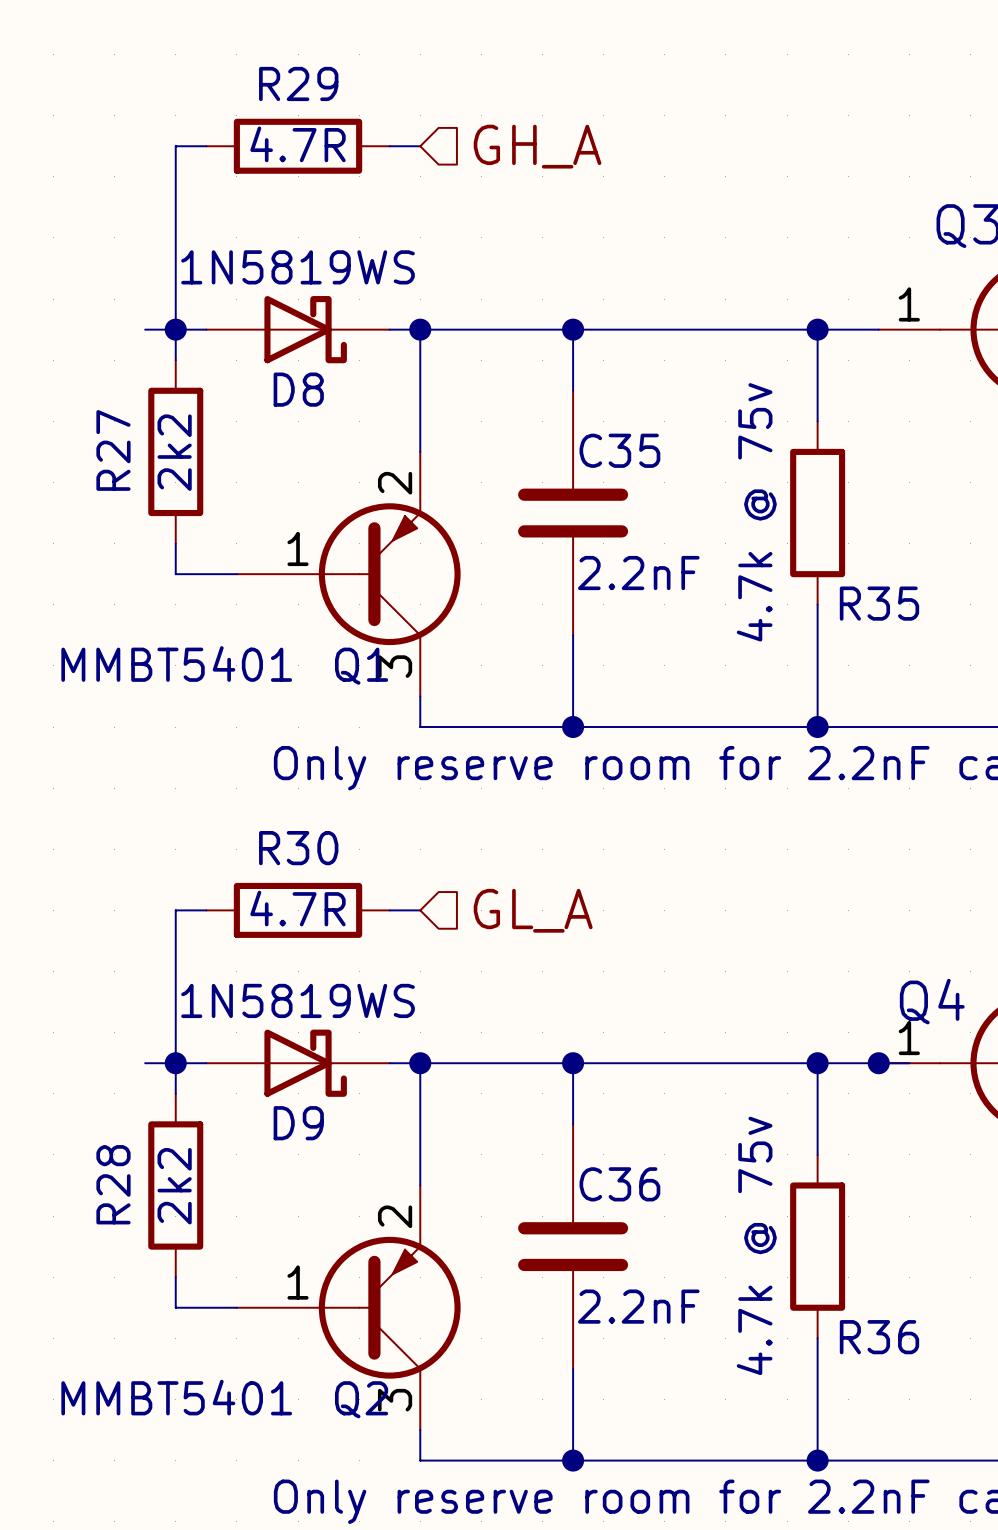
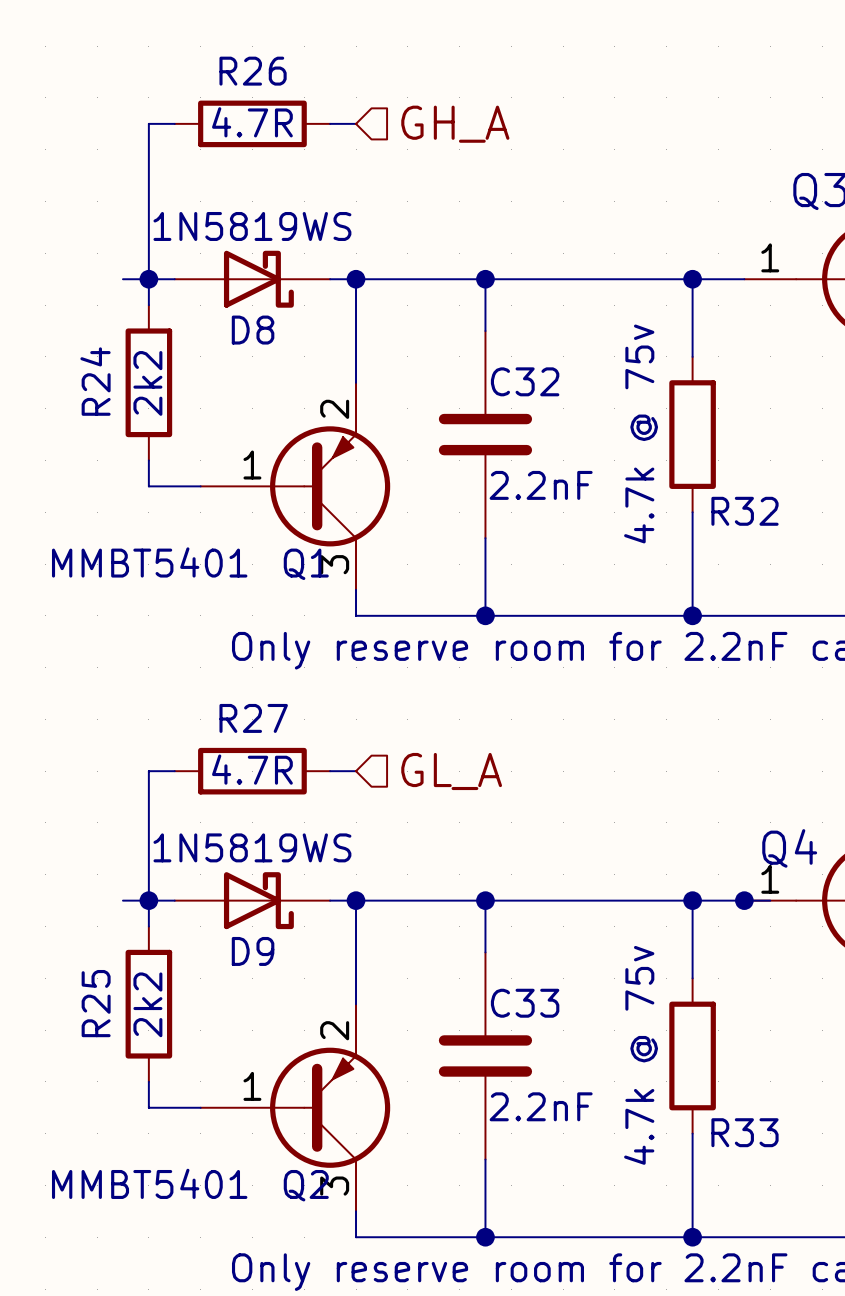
R29 name: R29 (298, 83) -> R26 (253, 71)
R27 name: R27 (113, 450) -> R24 (95, 381)
C35 name: C35 (619, 450) -> C32 (525, 381)
R35 name: R35 (879, 603) -> R32 (744, 511)
R30 name: R30 (298, 848) -> R27 (253, 718)
R28 name: R28 (113, 1184) -> R25 (96, 1003)
C36 name: C36 (619, 1184) -> C33 (525, 1003)
R36 name: R36 (879, 1337) -> R33 (744, 1132)

